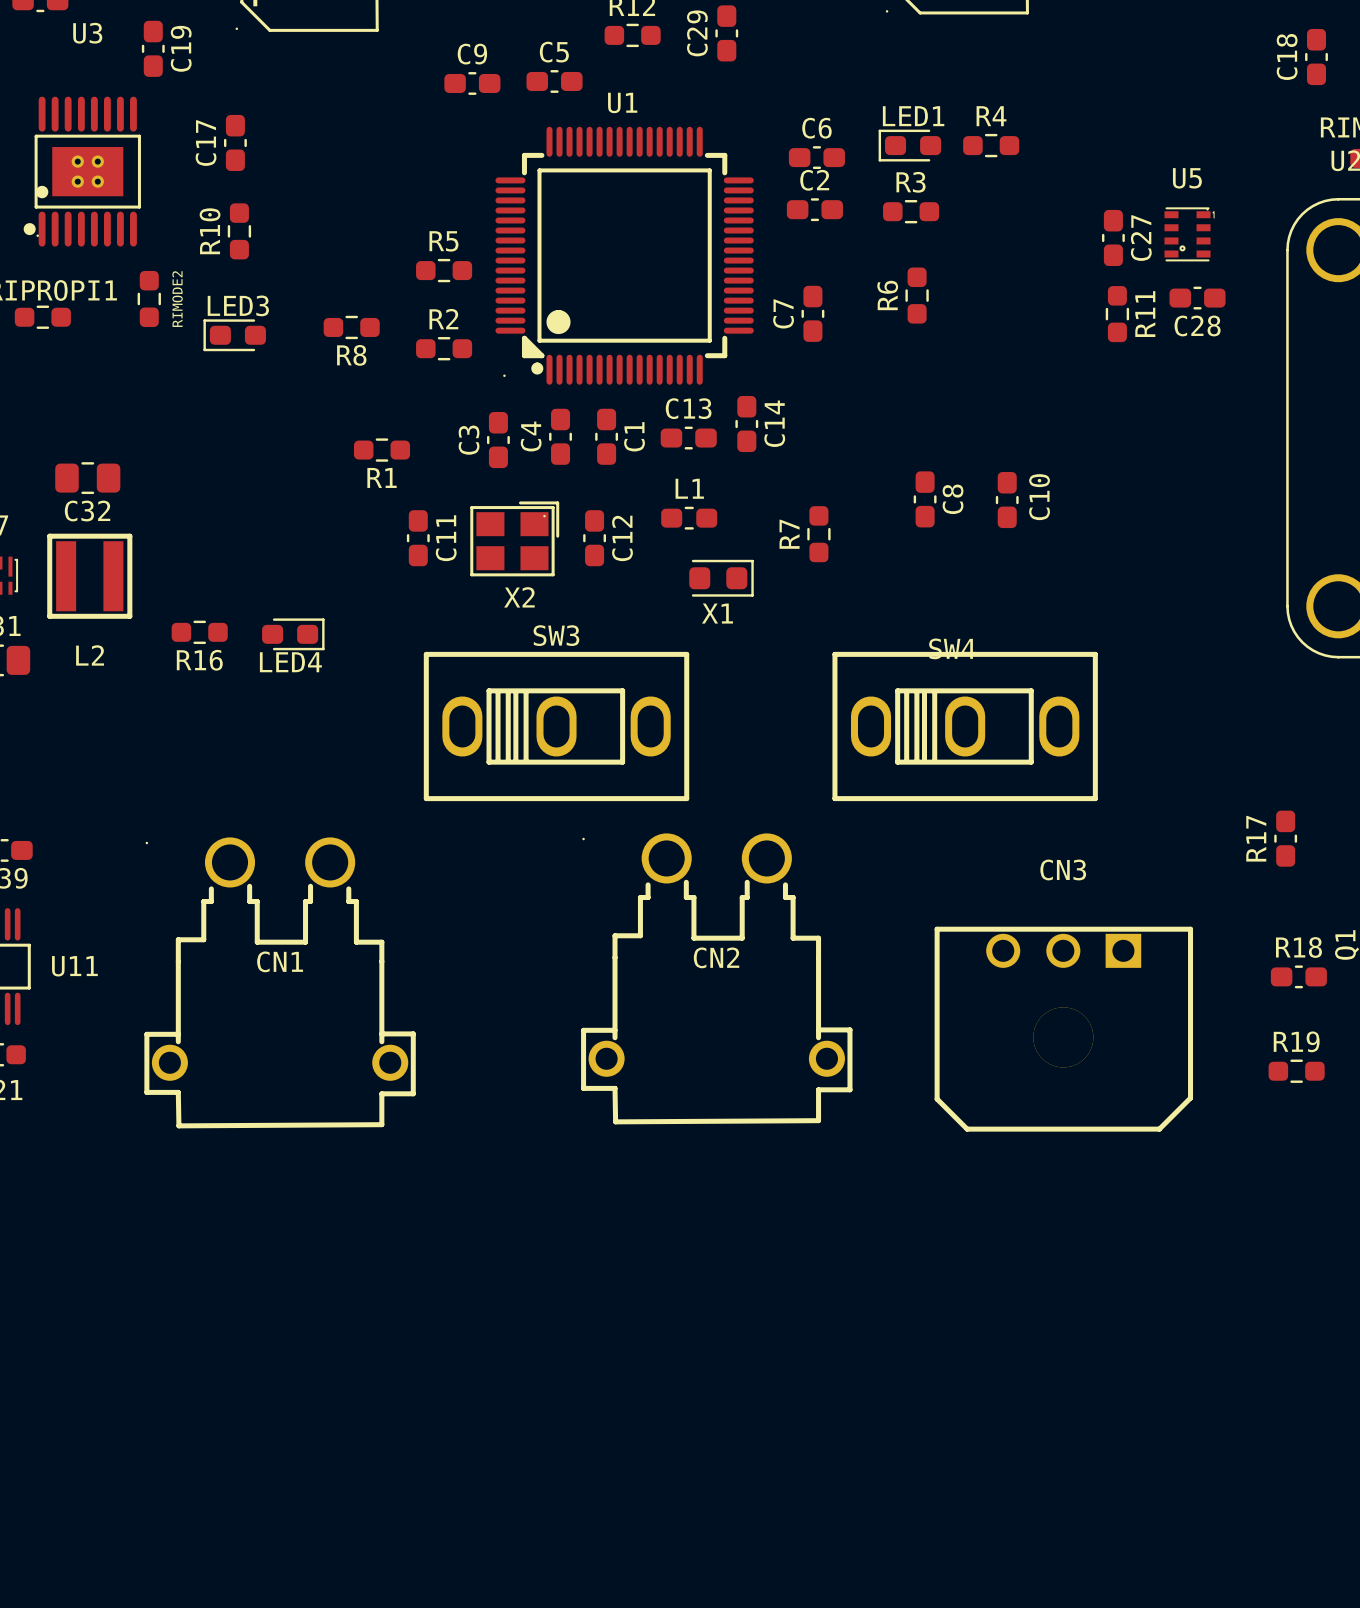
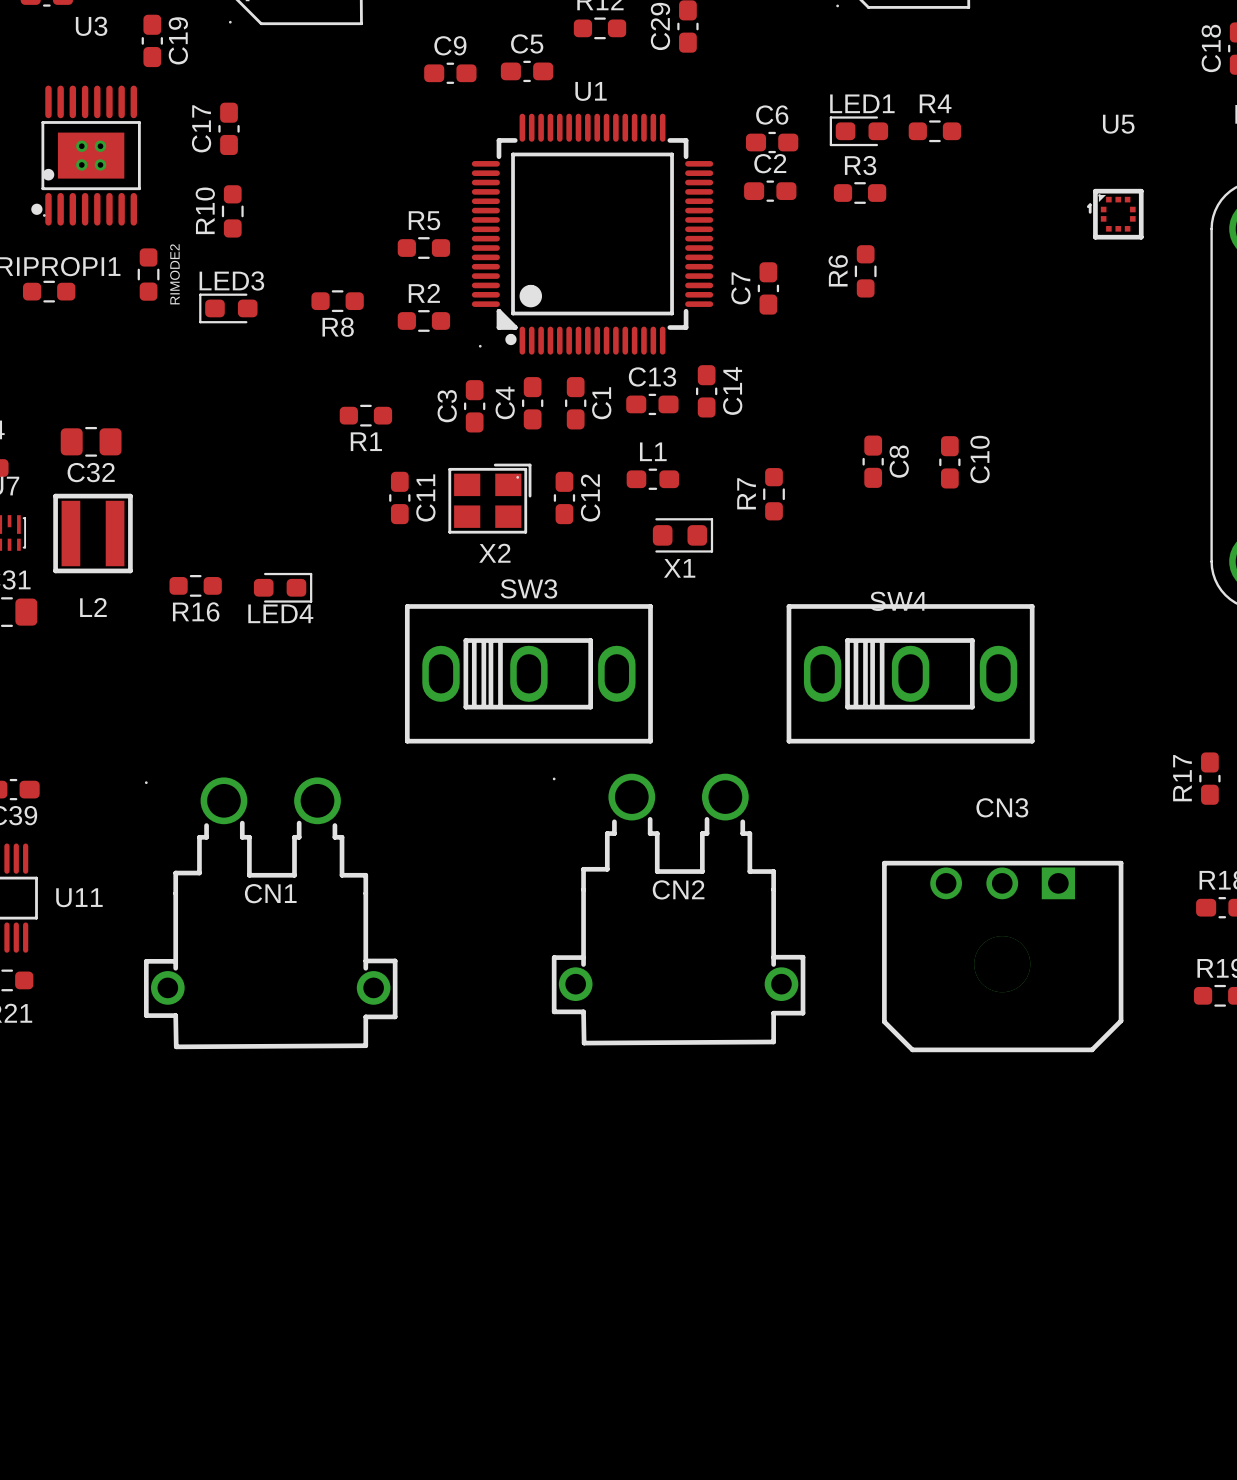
U5 name position: U5 (1187, 178) -> U5 (1118, 124)
U5 footprint: [1164, 207, 1215, 262] -> [1086, 188, 1144, 240]
C27: (1113, 237) -> none
C28: (1197, 298) -> none
R11: (1117, 314) -> none

